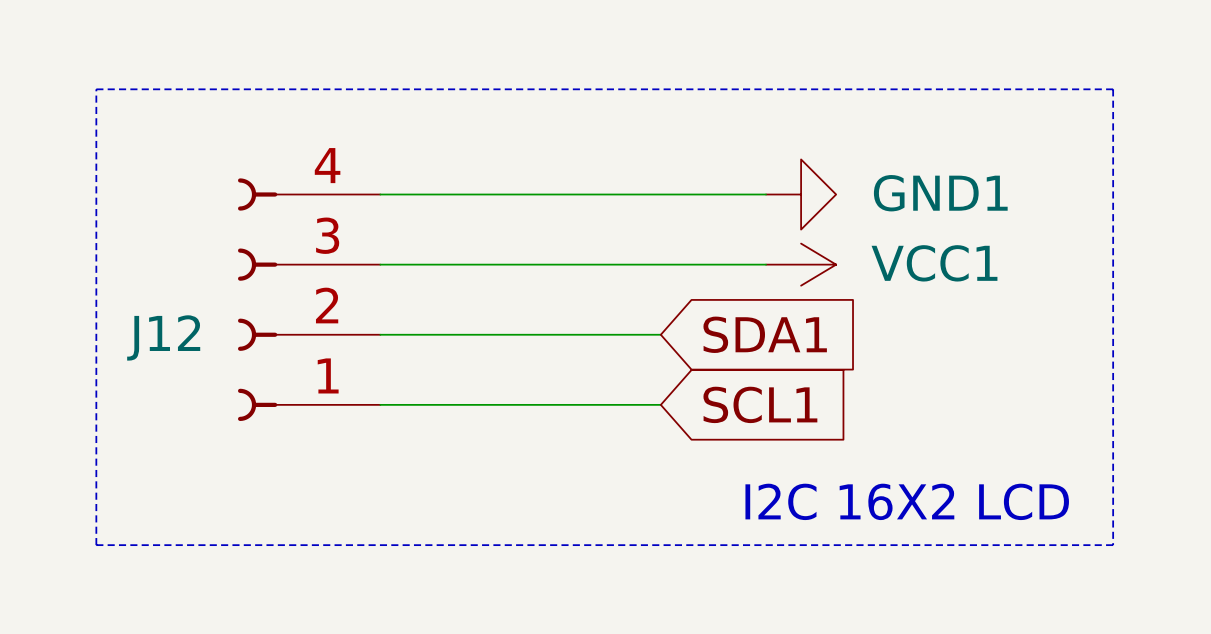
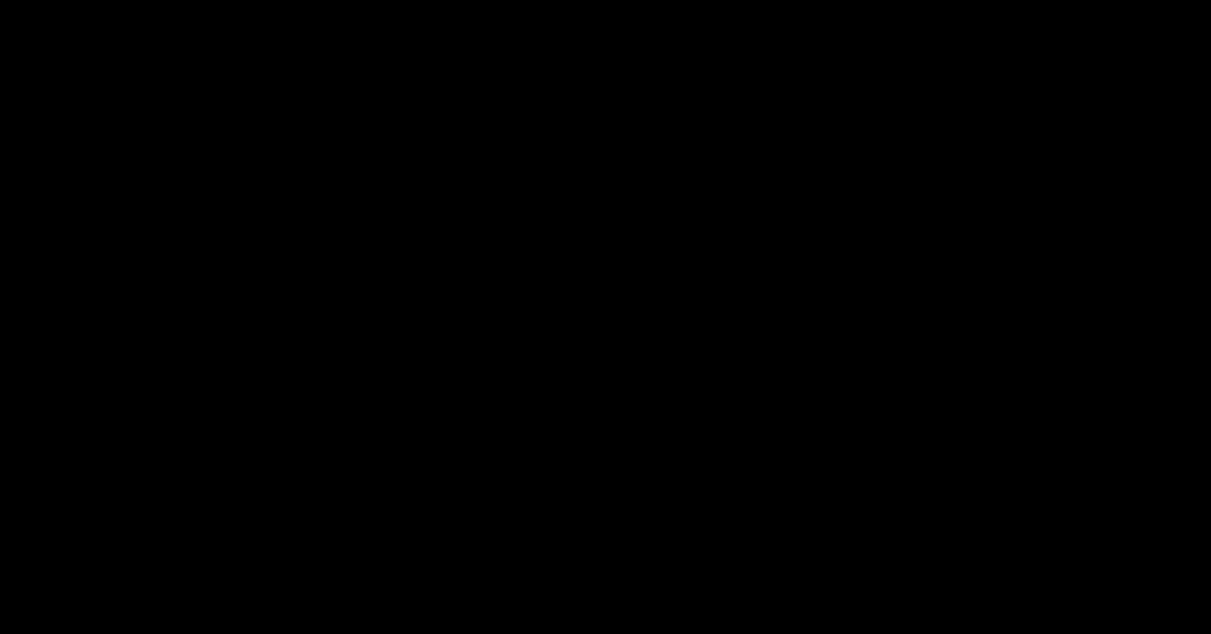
line: (96, 89) (1113, 89) (1113, 545) (96, 545) (96, 89) -> none
wire: (380, 194) (766, 194) -> none
power symbol: GND1 (801, 194) -> none
wire: (380, 264) (766, 264) -> none
power symbol: VCC1 (801, 264) -> none
J12: (309, 299) -> none
wire: (380, 334) (660, 334) -> none
global label: SDA1 (765, 334) -> none
wire: (380, 404) (660, 404) -> none
global label: SCL1 (760, 404) -> none
text: I2C 16X2 LCD (907, 501) -> none

